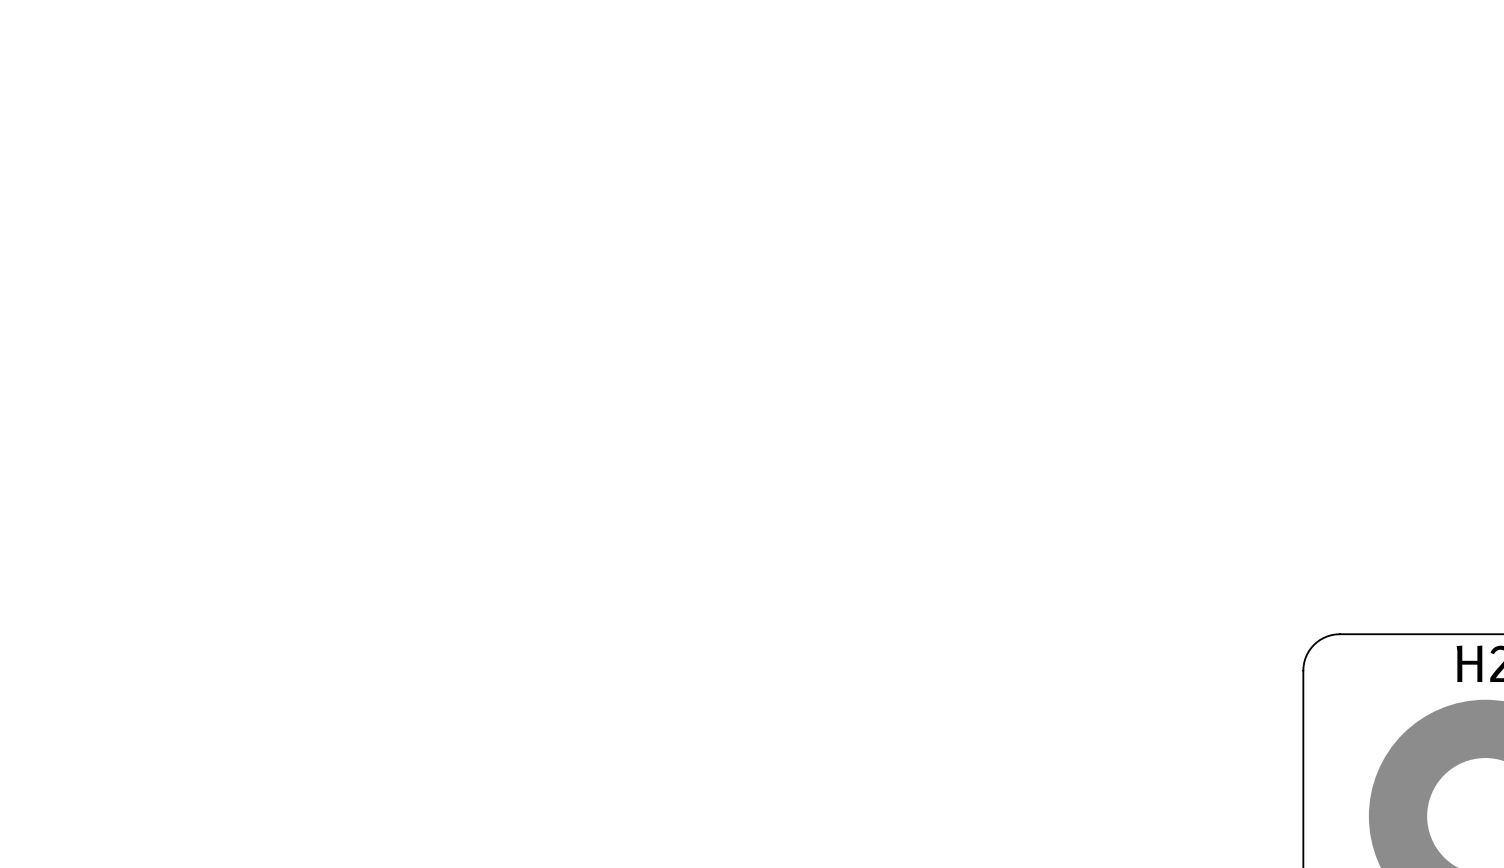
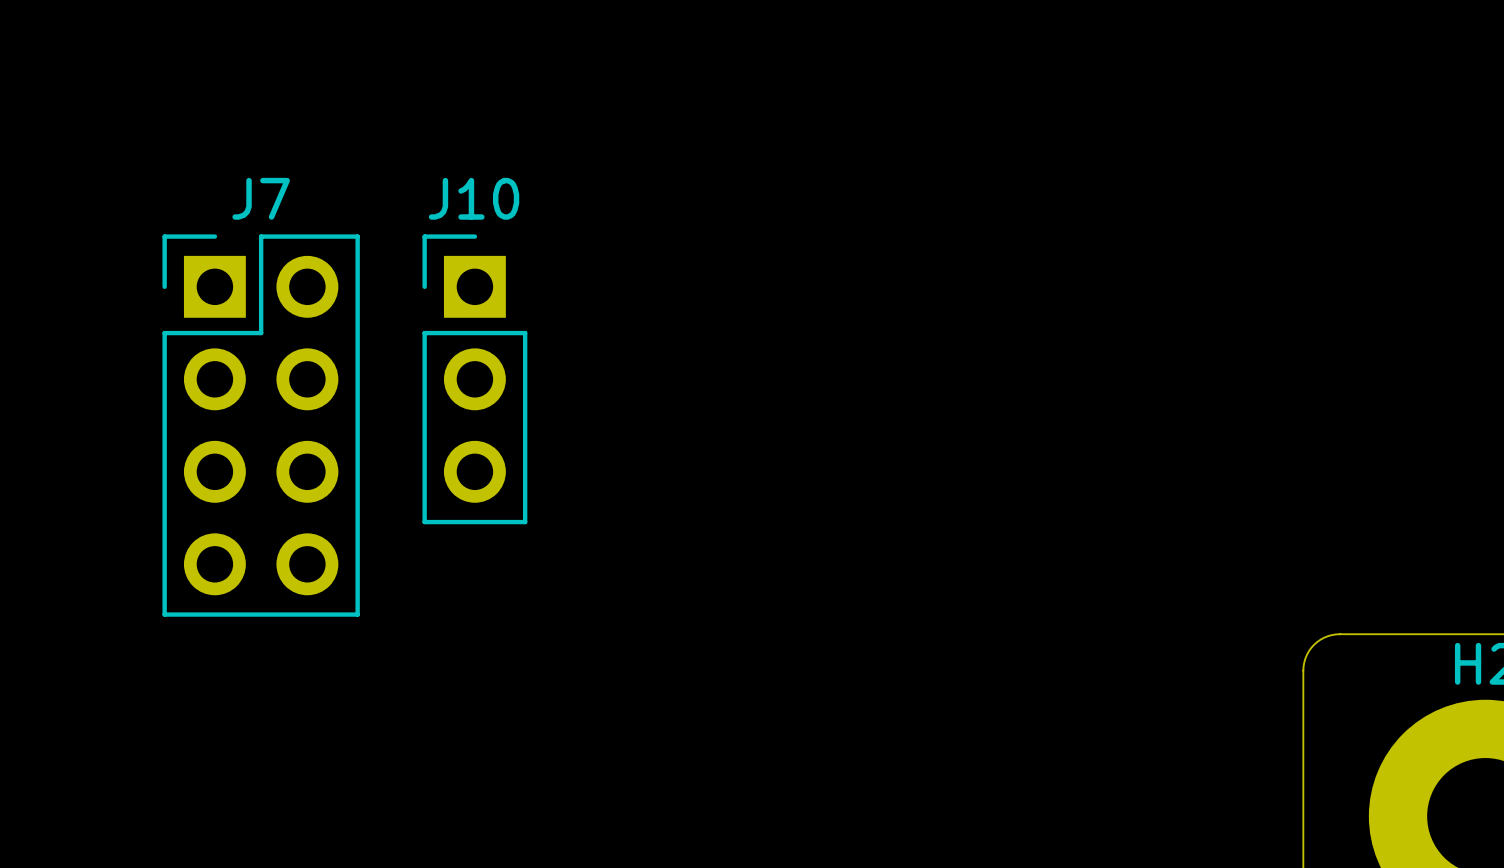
J10: none -> (474, 379)
J7: none -> (261, 425)

